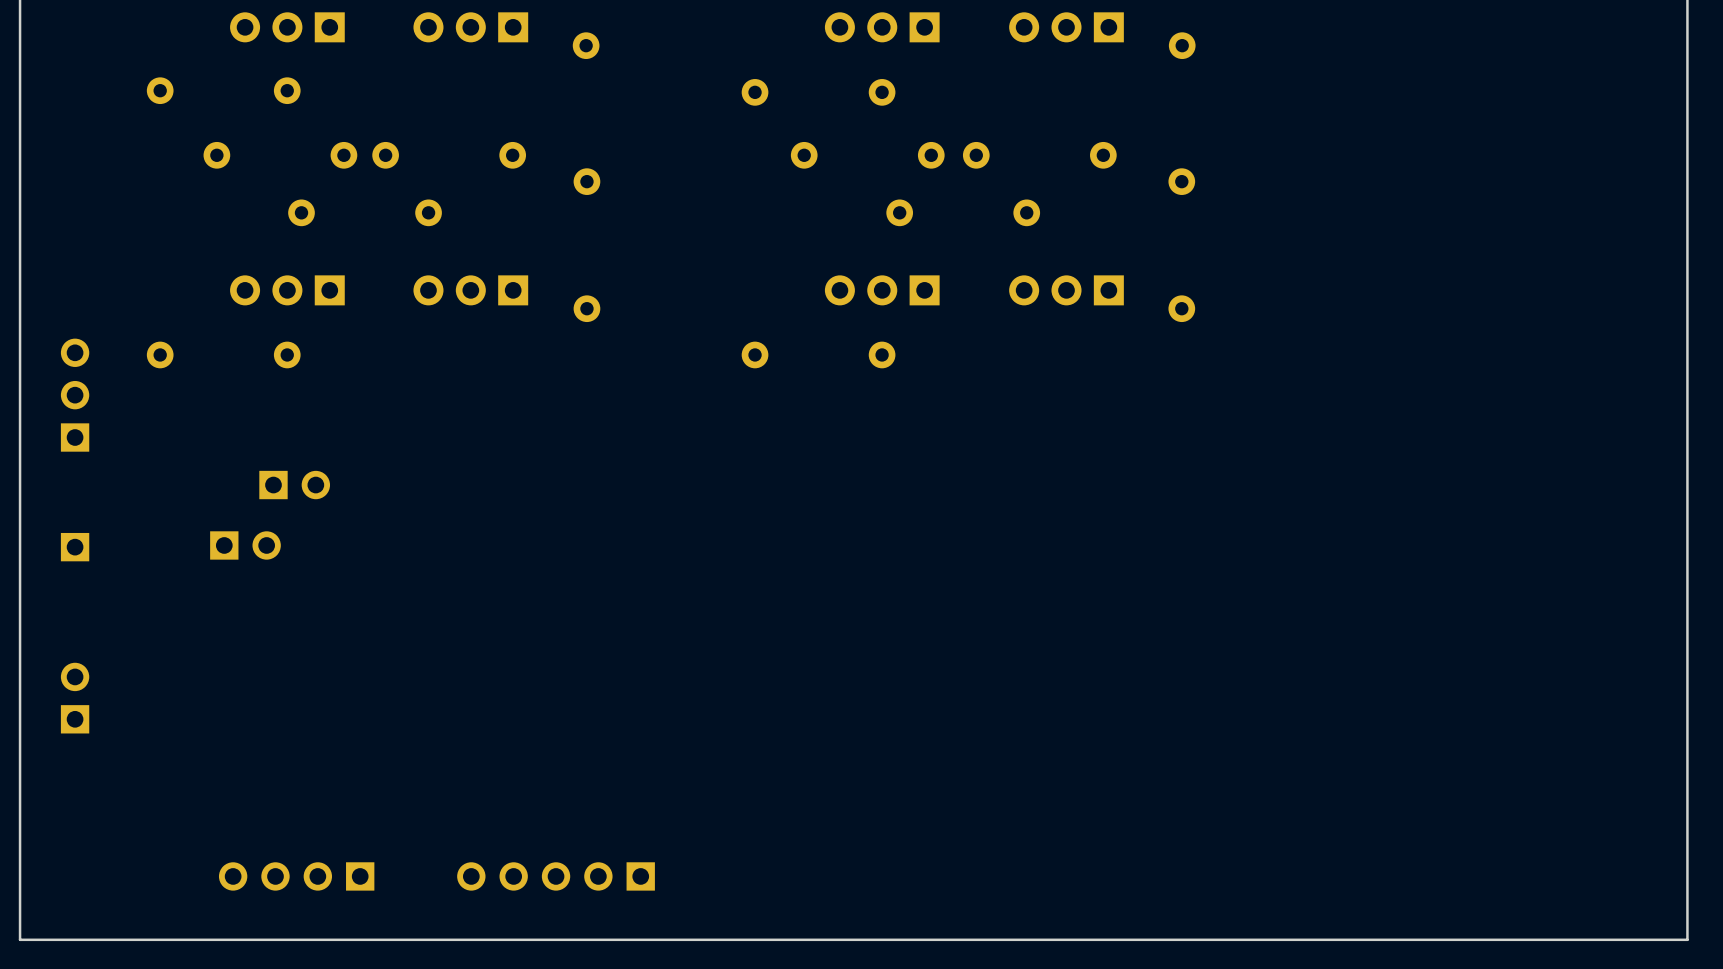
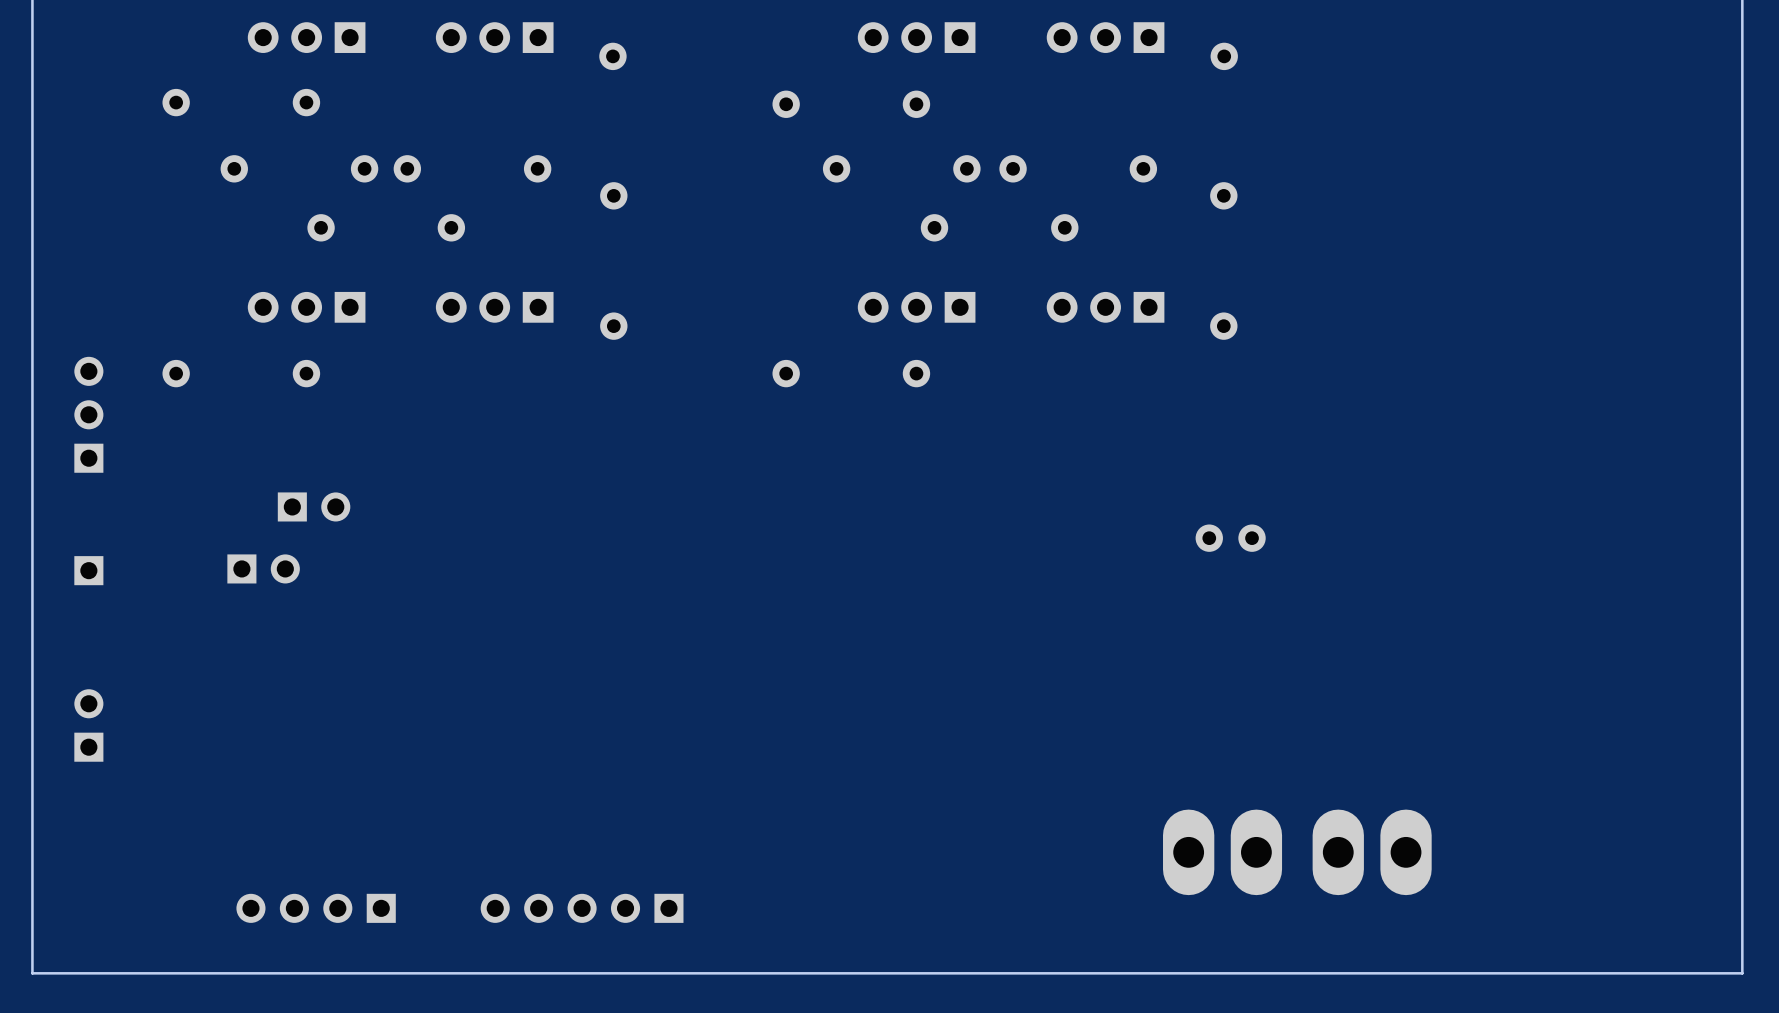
part: none -> (1230, 538)
part: none -> (1222, 852)
part: none -> (1372, 852)

